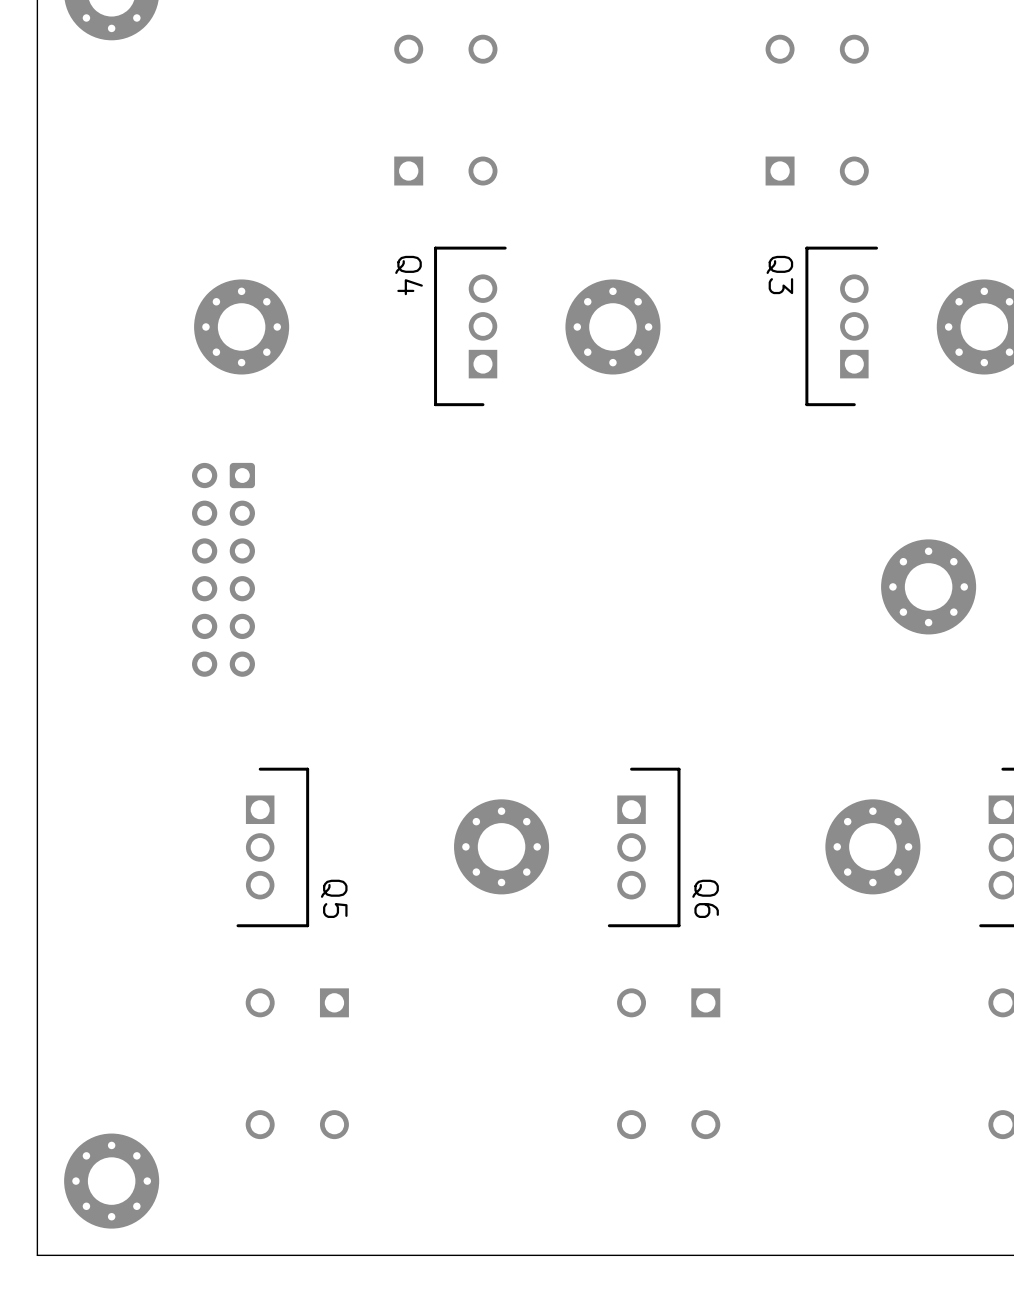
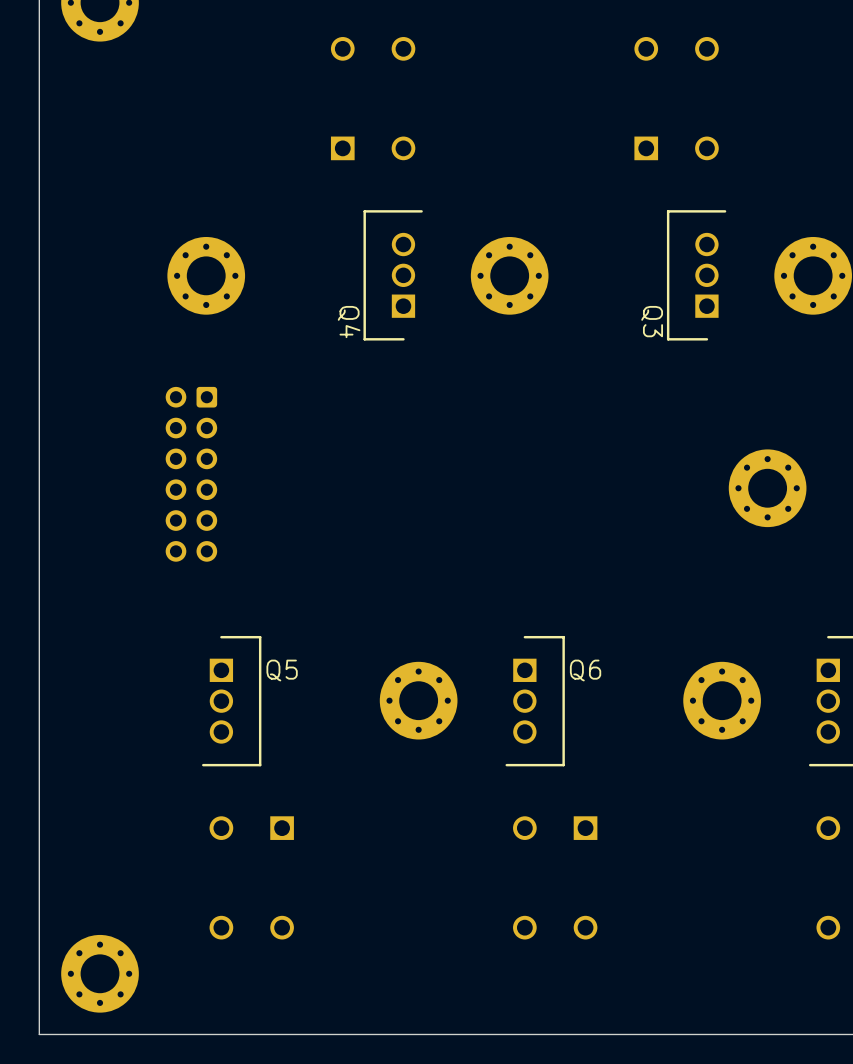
Q3 name position: Q3 (779, 274) -> Q3 (652, 321)
Q4 name position: Q4 (409, 275) -> Q4 (349, 322)
Q5 name rotation: 0° (334, 898) -> 90° counterclockwise (282, 670)
Q5 name position: Q5 (334, 898) -> Q5 (282, 670)
Q6 name rotation: 0° (705, 898) -> 90° counterclockwise (585, 670)
Q6 name position: Q6 (705, 898) -> Q6 (585, 670)

